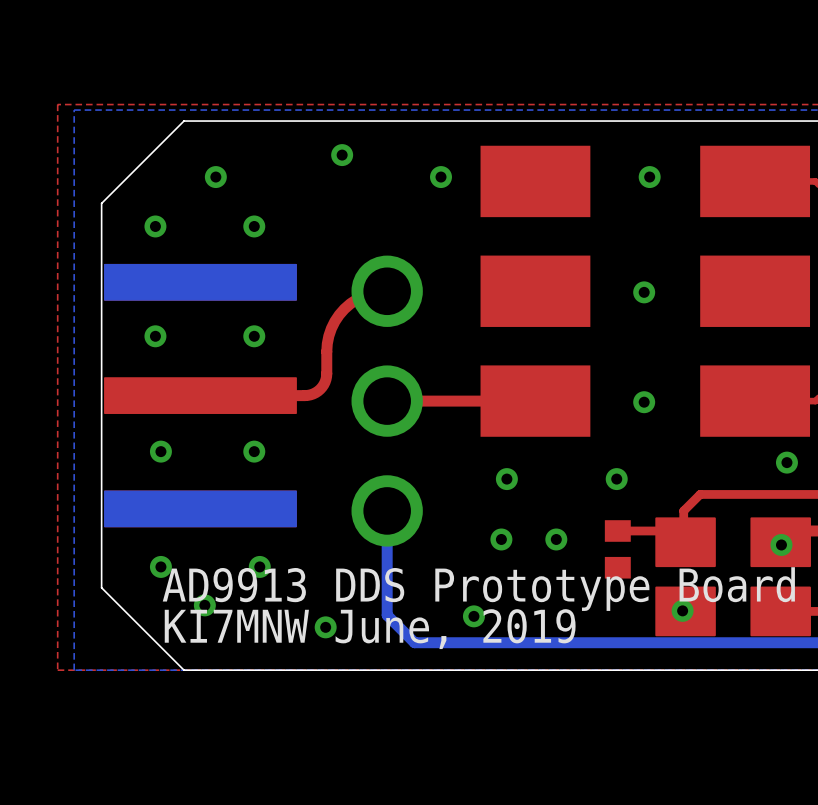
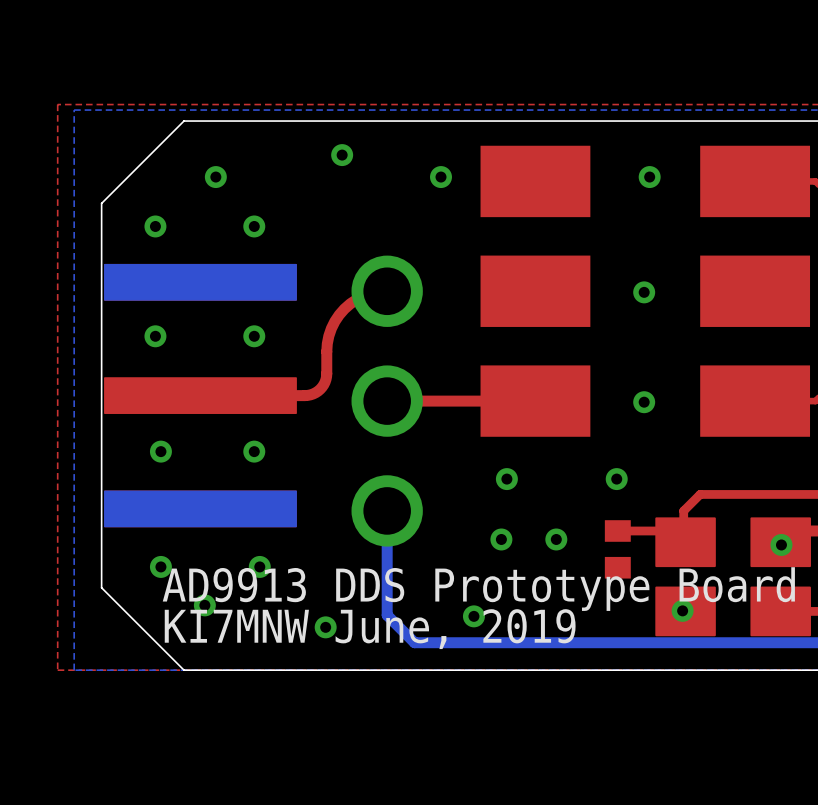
via: (786, 462) -> none

